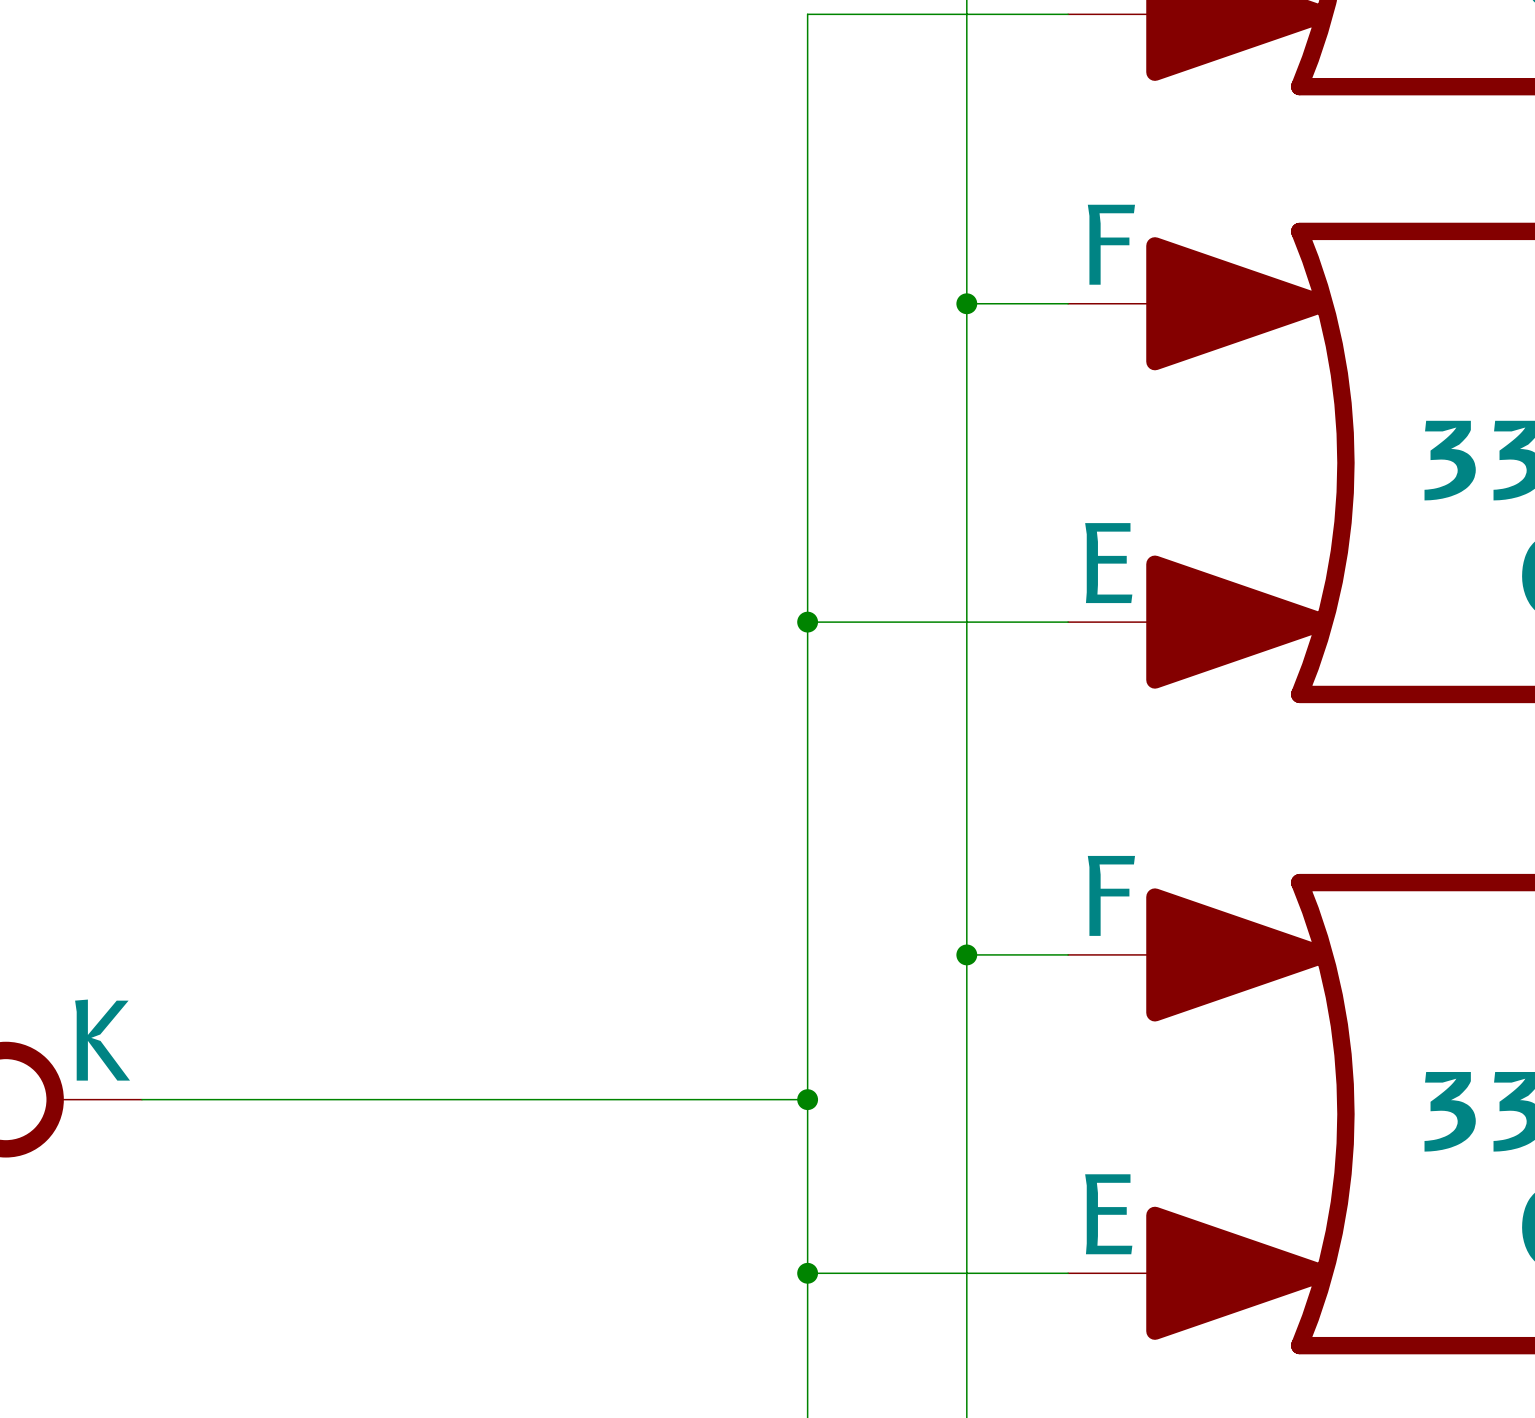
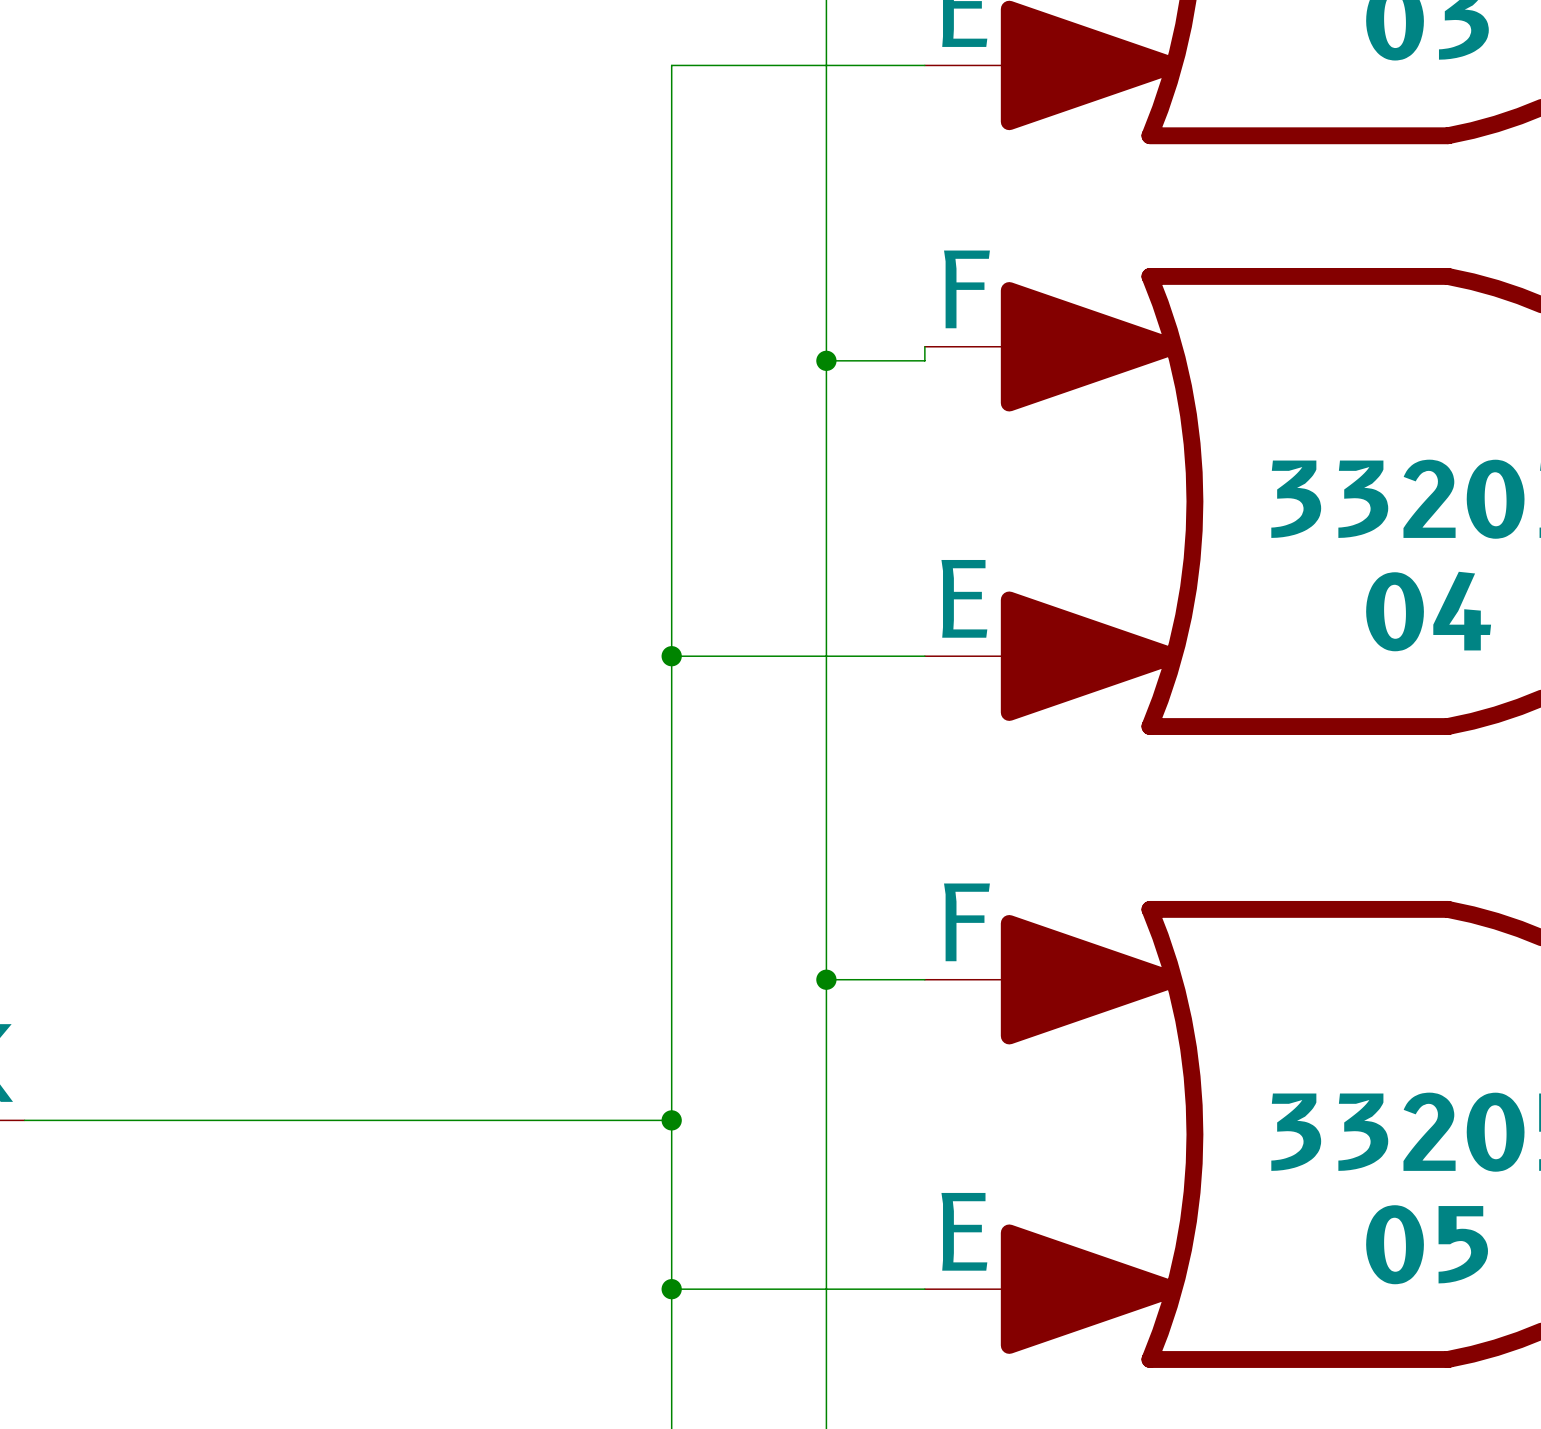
wire: (966, 303) (1068, 303) -> (826, 360) (924, 360) (924, 346)
junction position: (966, 303) -> (826, 360)

